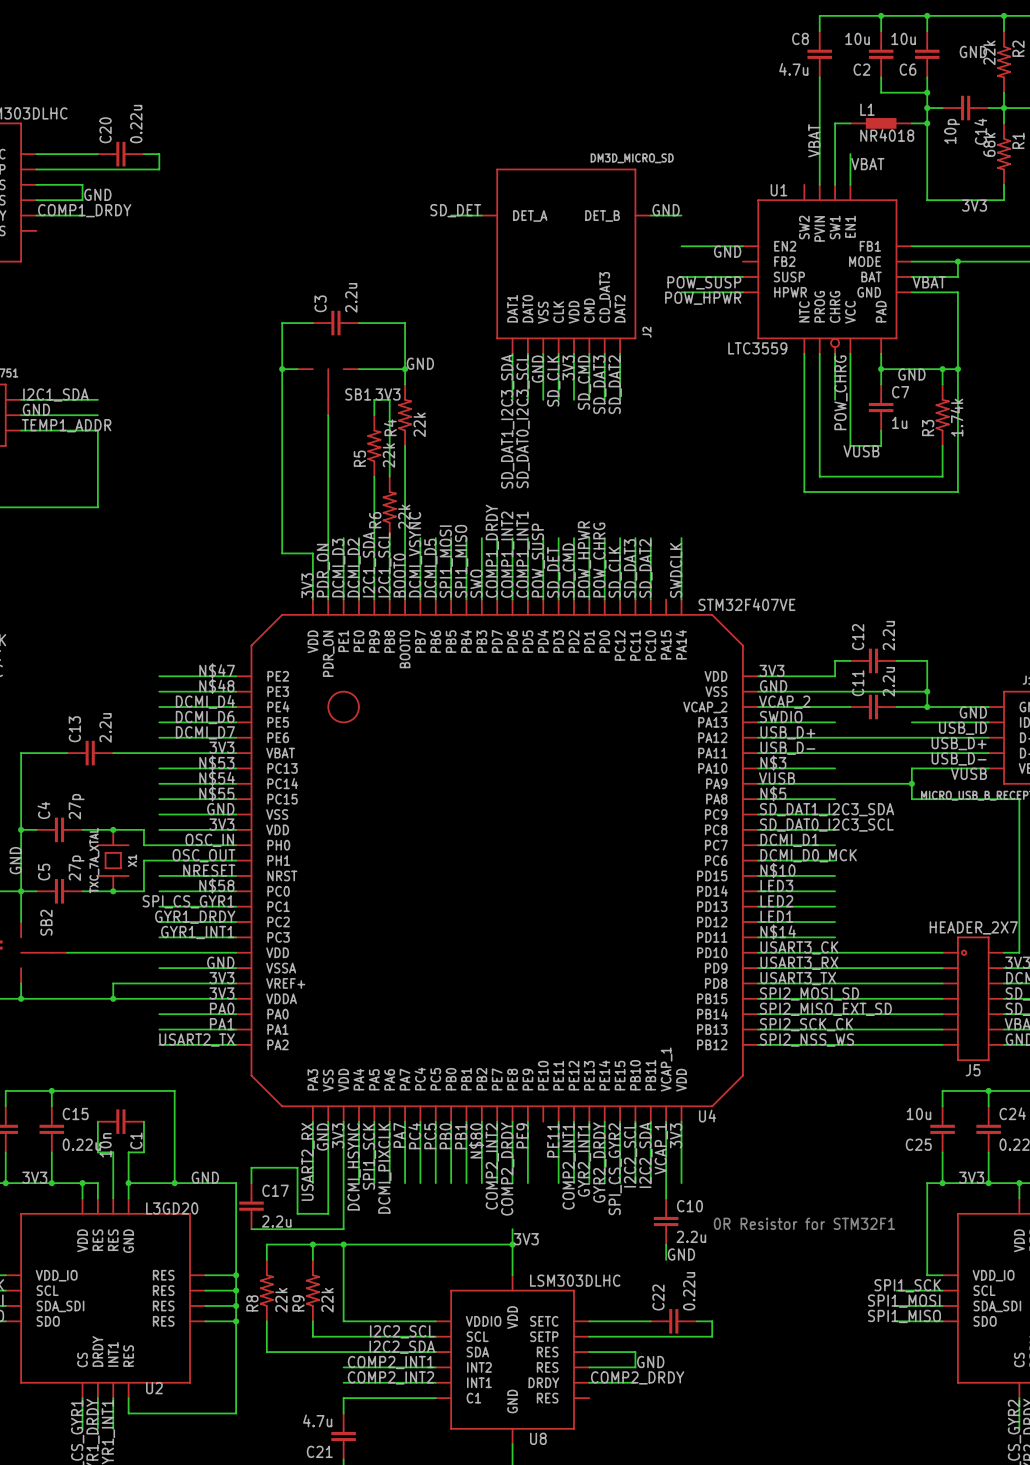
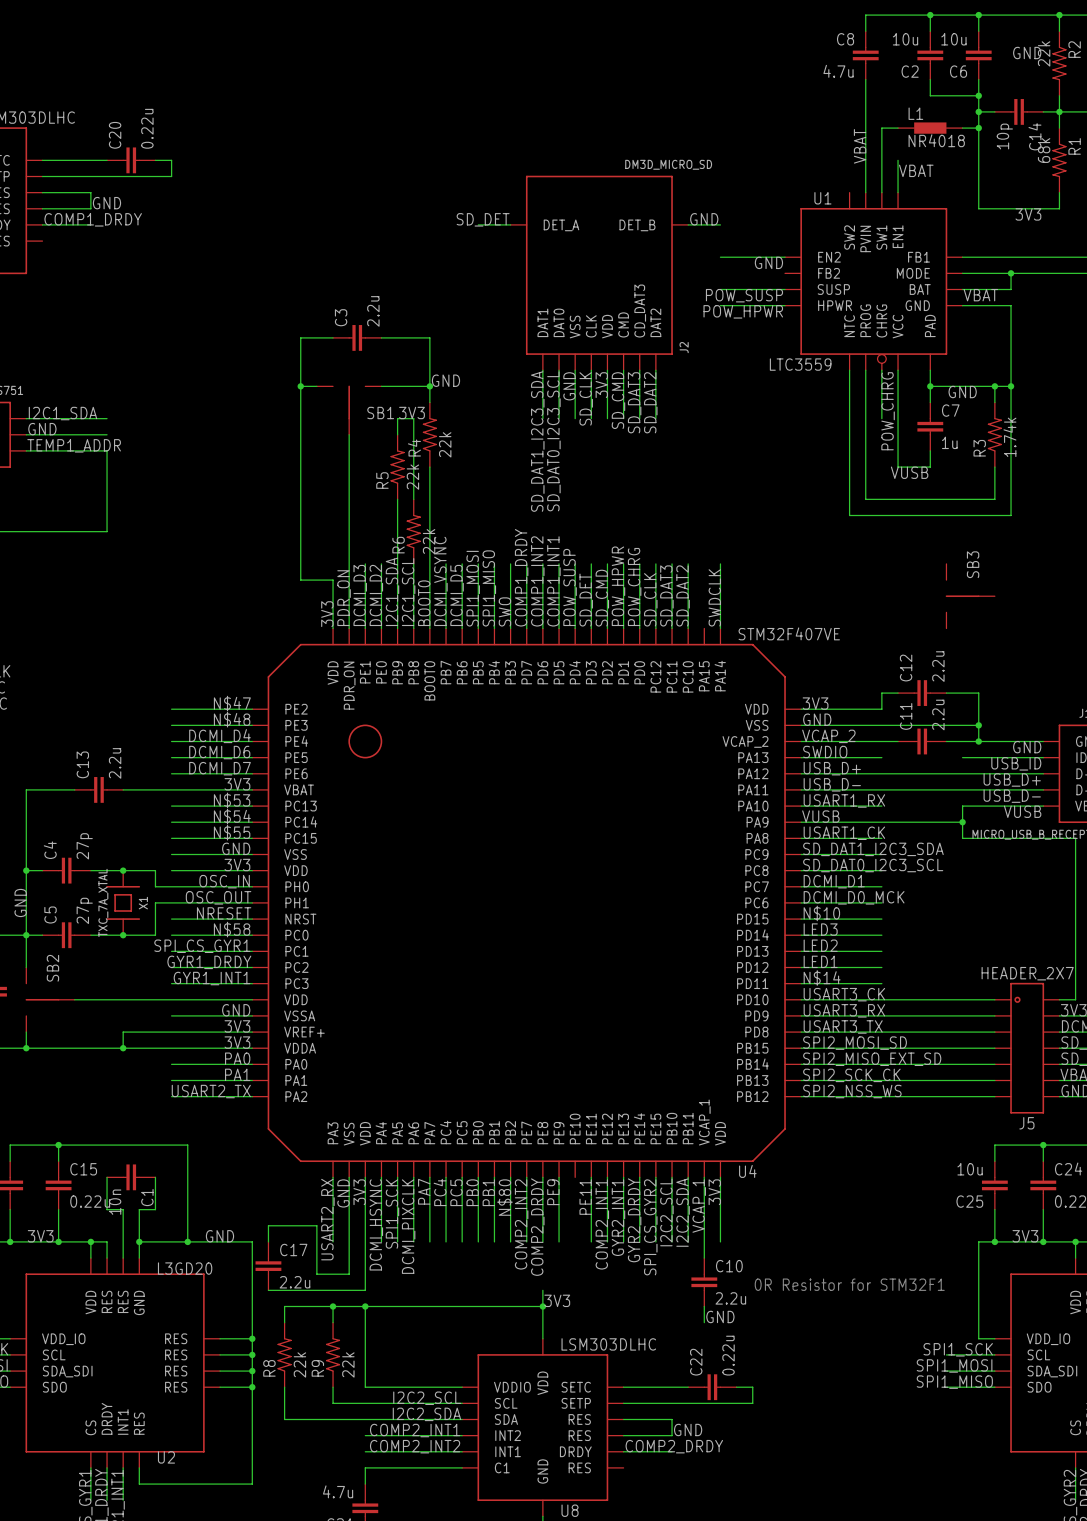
SB3: none -> (970, 596)
label: N$3 (773, 763) -> USART1_RX (844, 800)
label: N$5 (773, 793) -> USART1_CK (844, 833)

